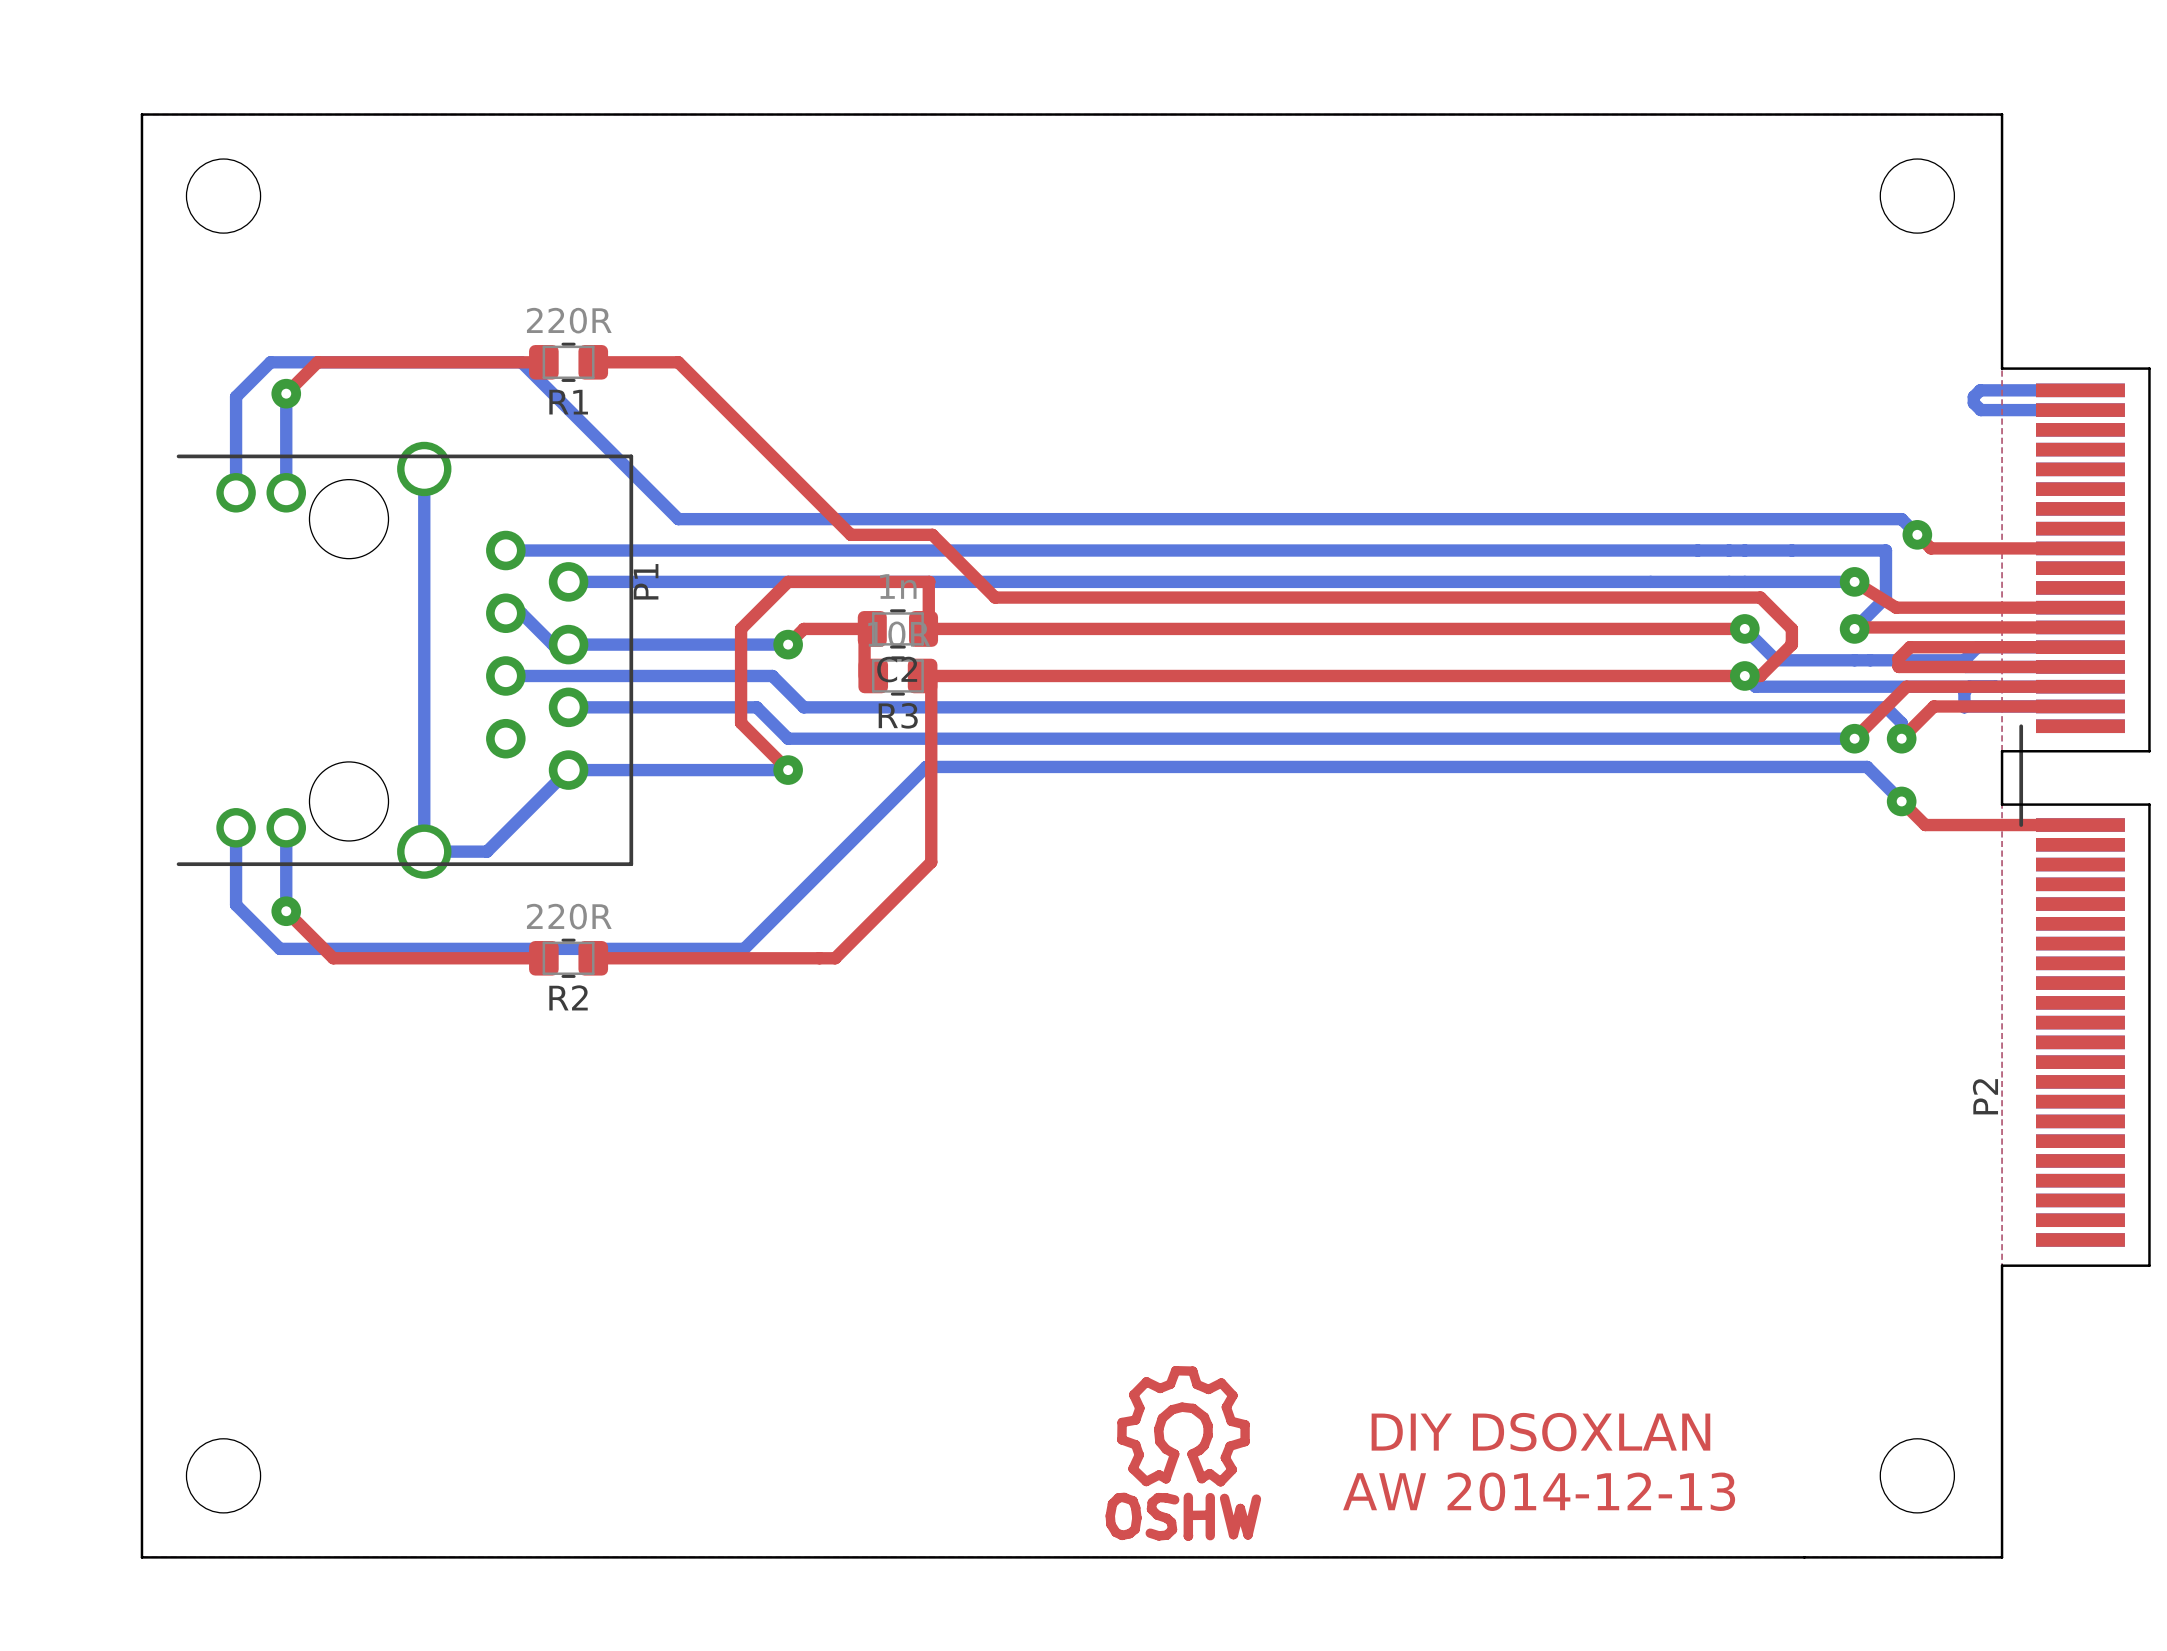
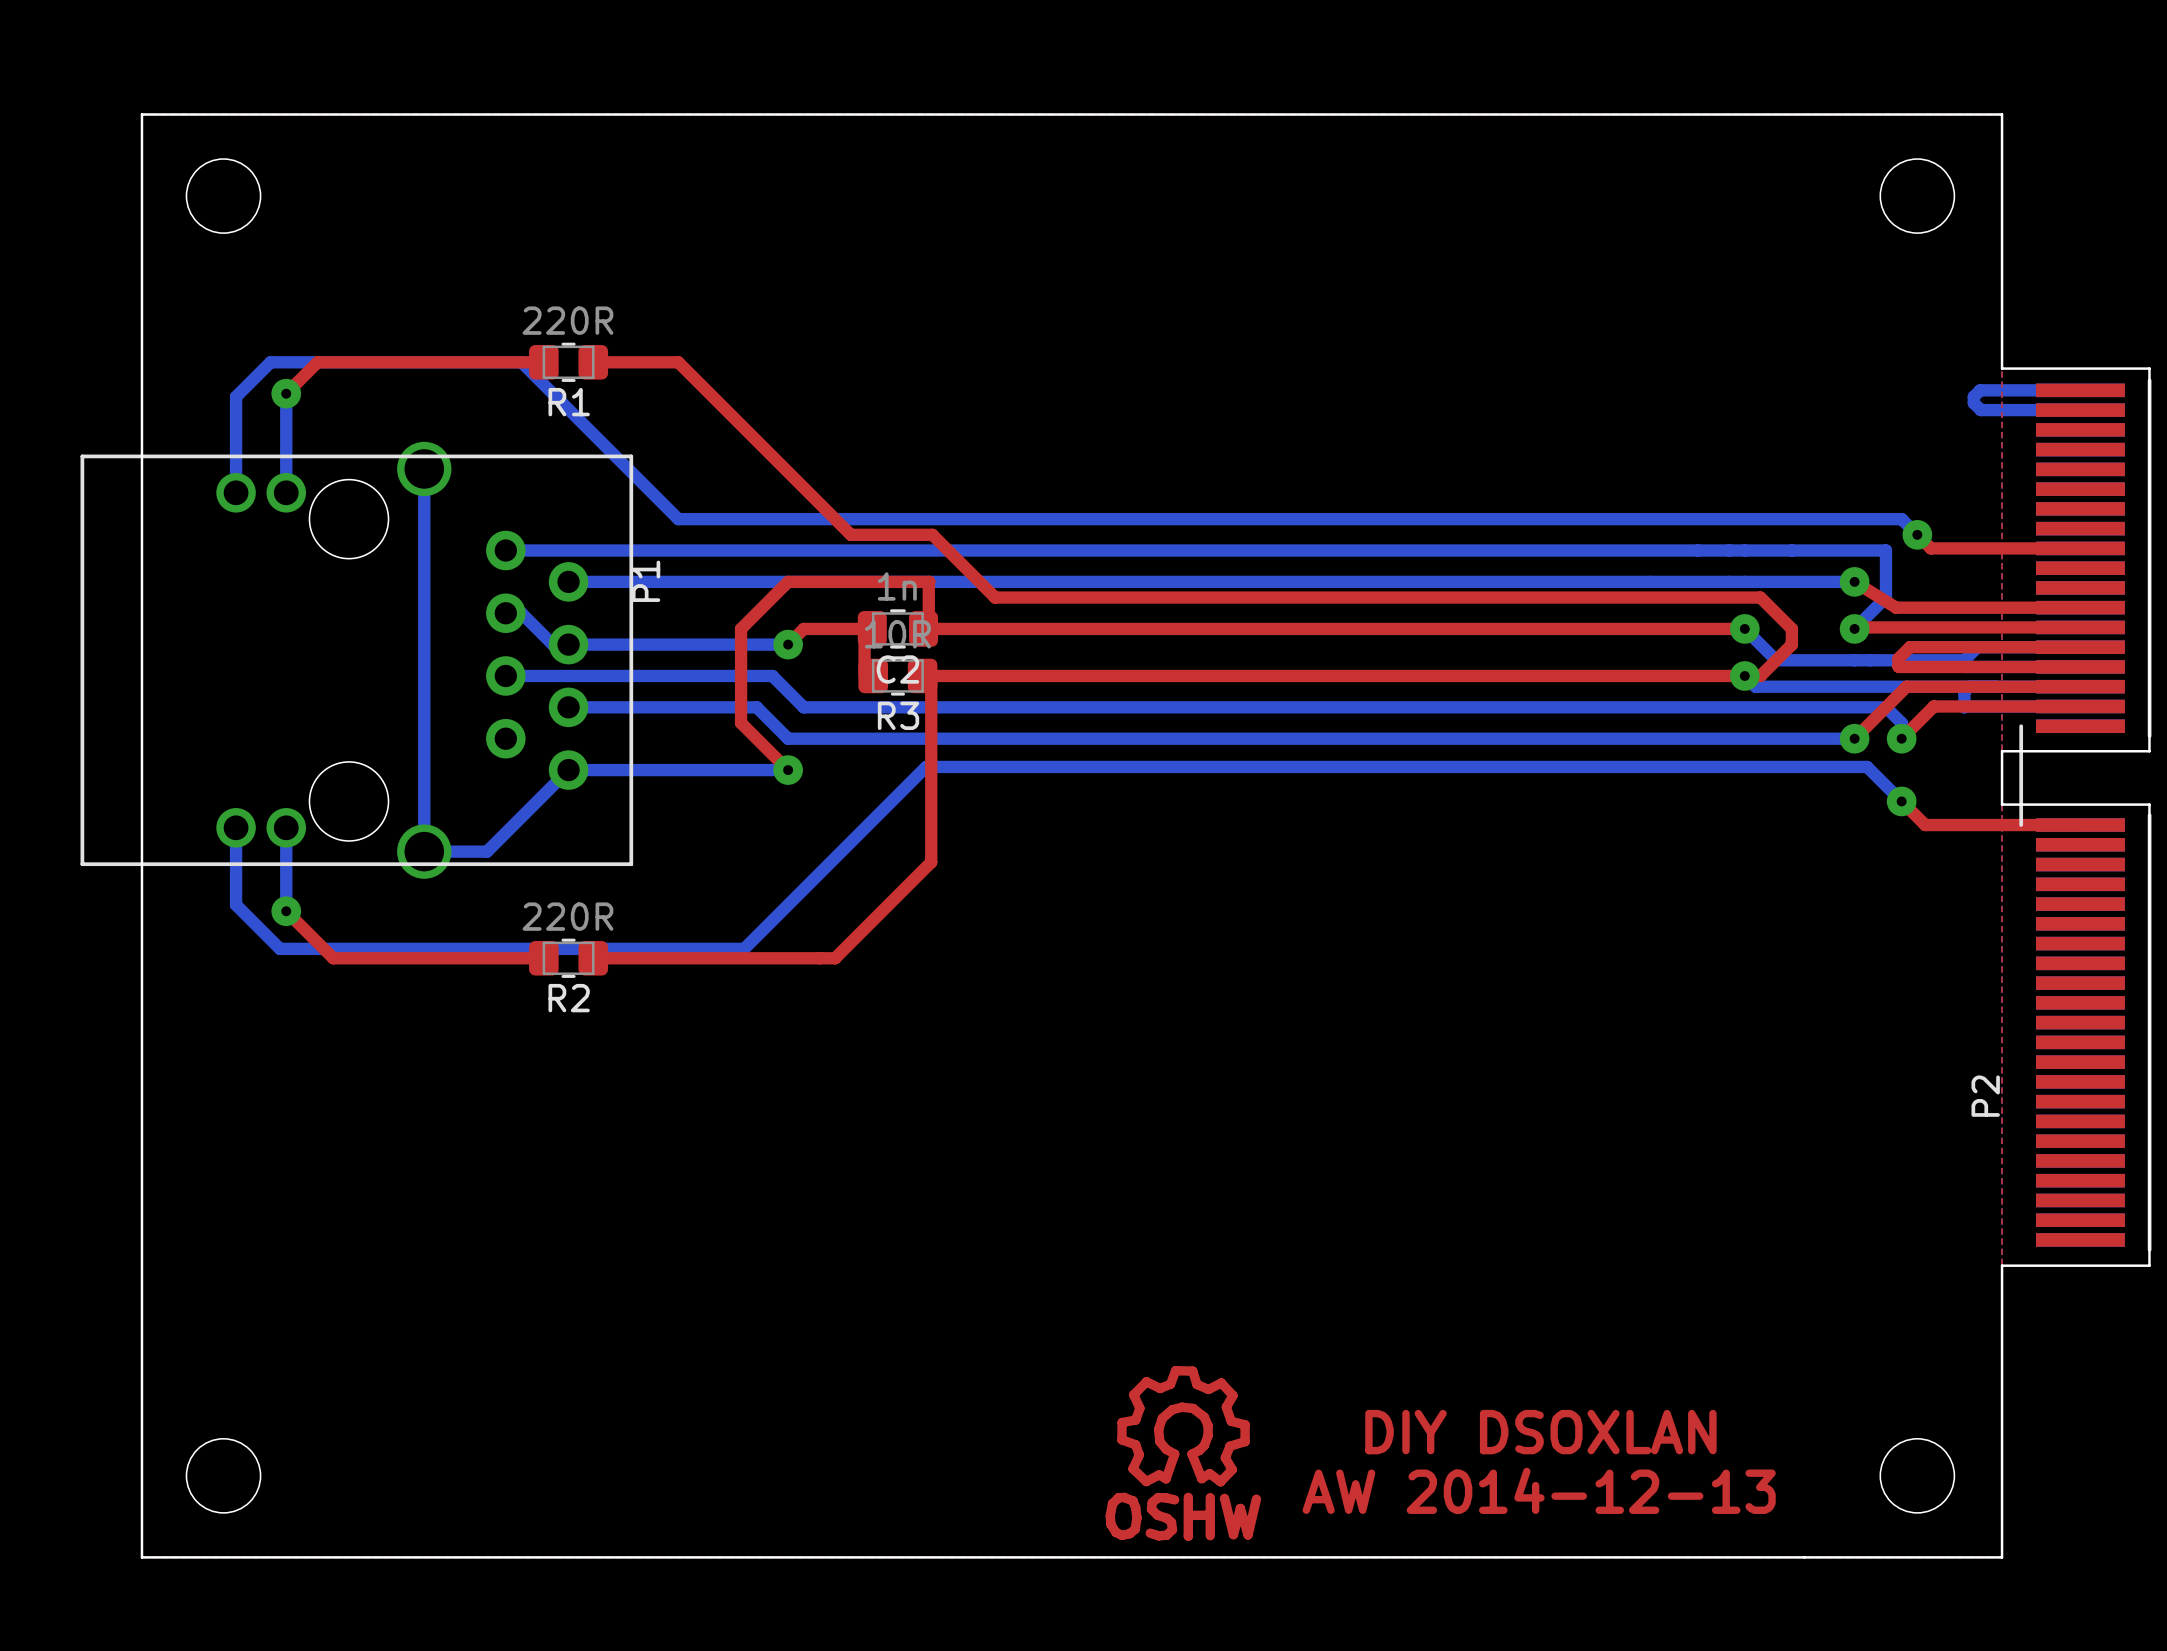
P2 footprint: [2019, 383, 2125, 1247] -> [2019, 378, 2152, 1252]
P1 footprint: [176, 441, 634, 879] -> [80, 441, 634, 879]

